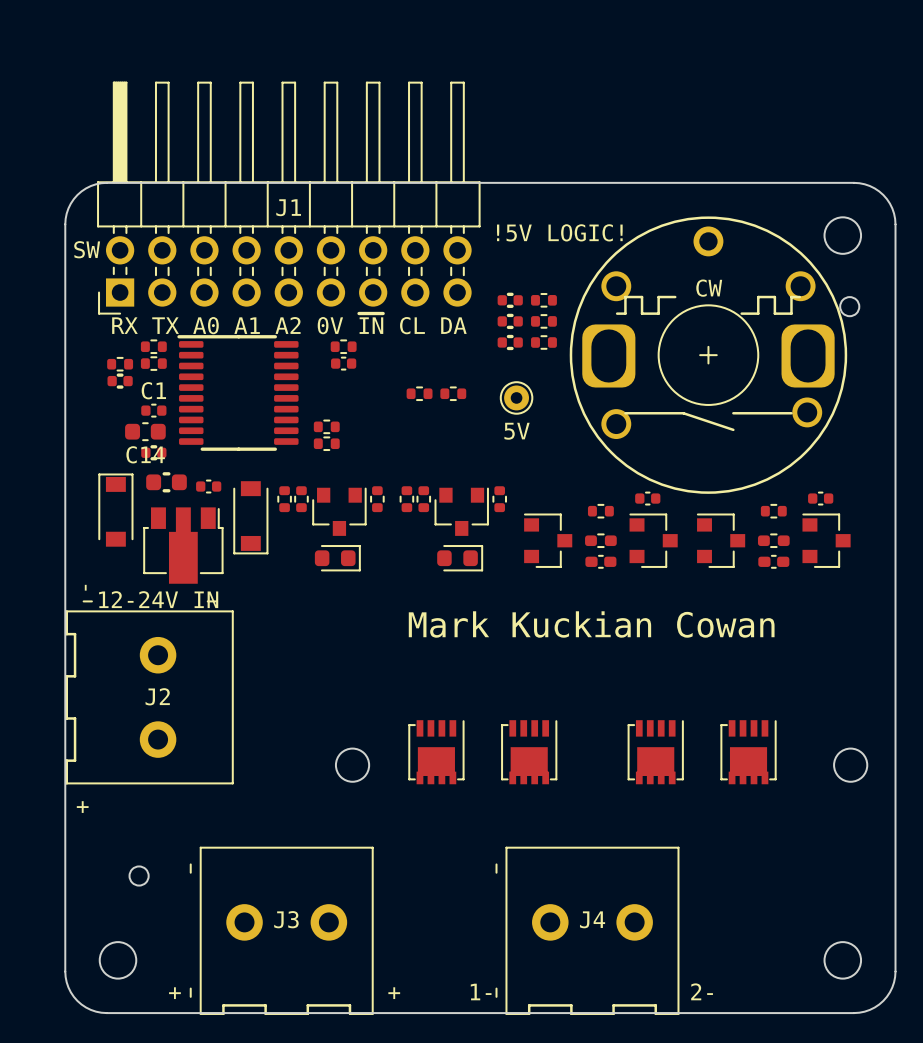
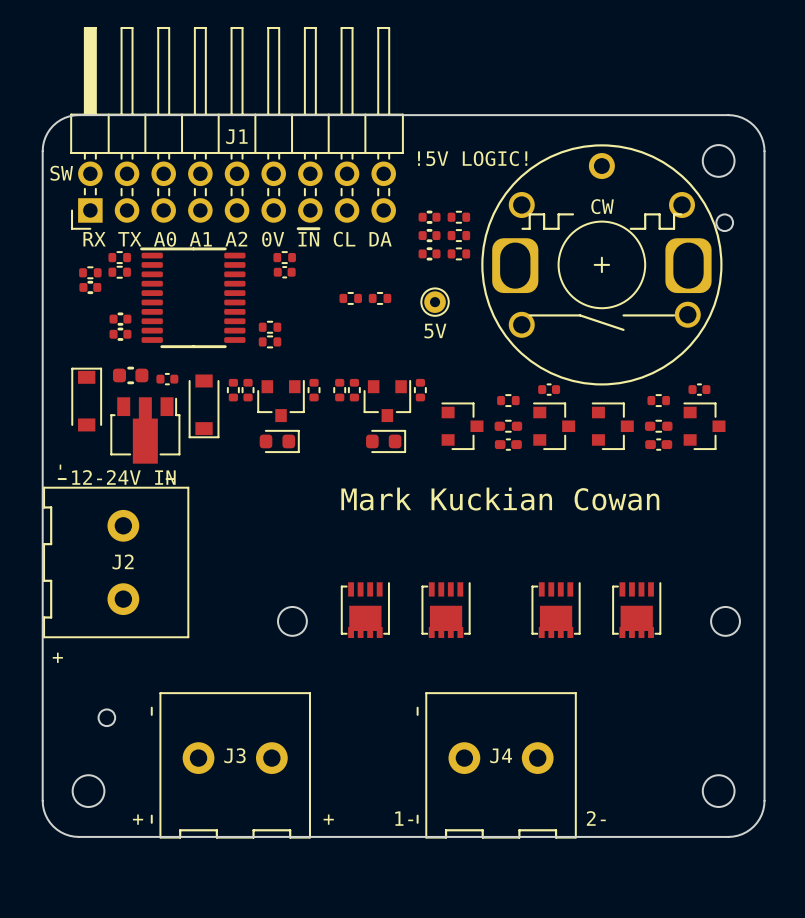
C1: (153, 410) -> none
part: none -> (120, 319)
C14: (145, 431) -> none
part: none -> (120, 334)
part: (153, 452) -> none

